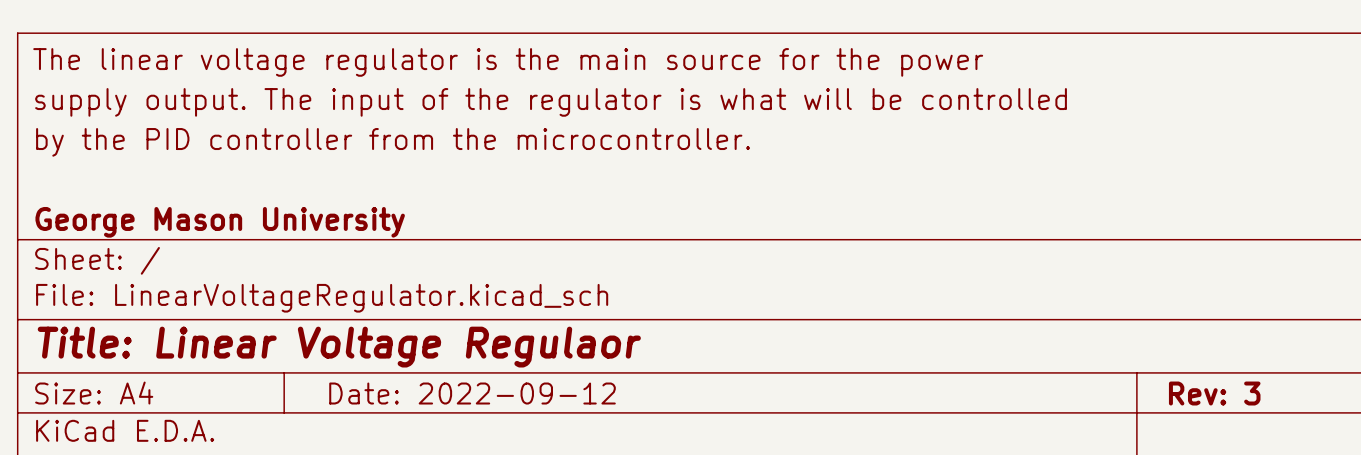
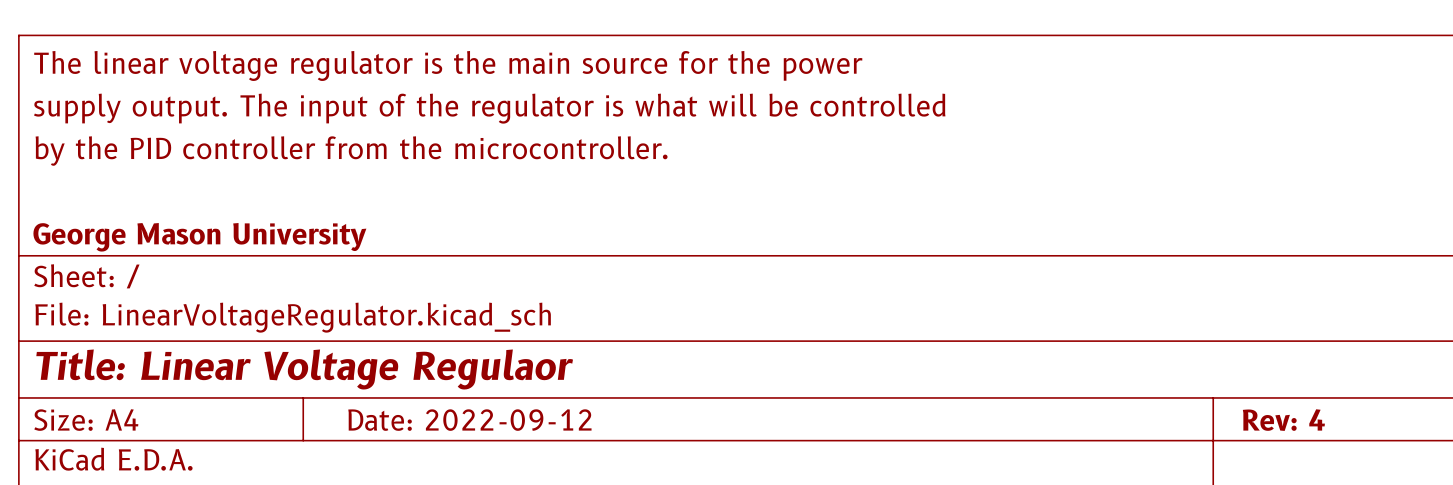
title block: Rev: 3 (1214, 393) -> Rev: 4 (1283, 420)

